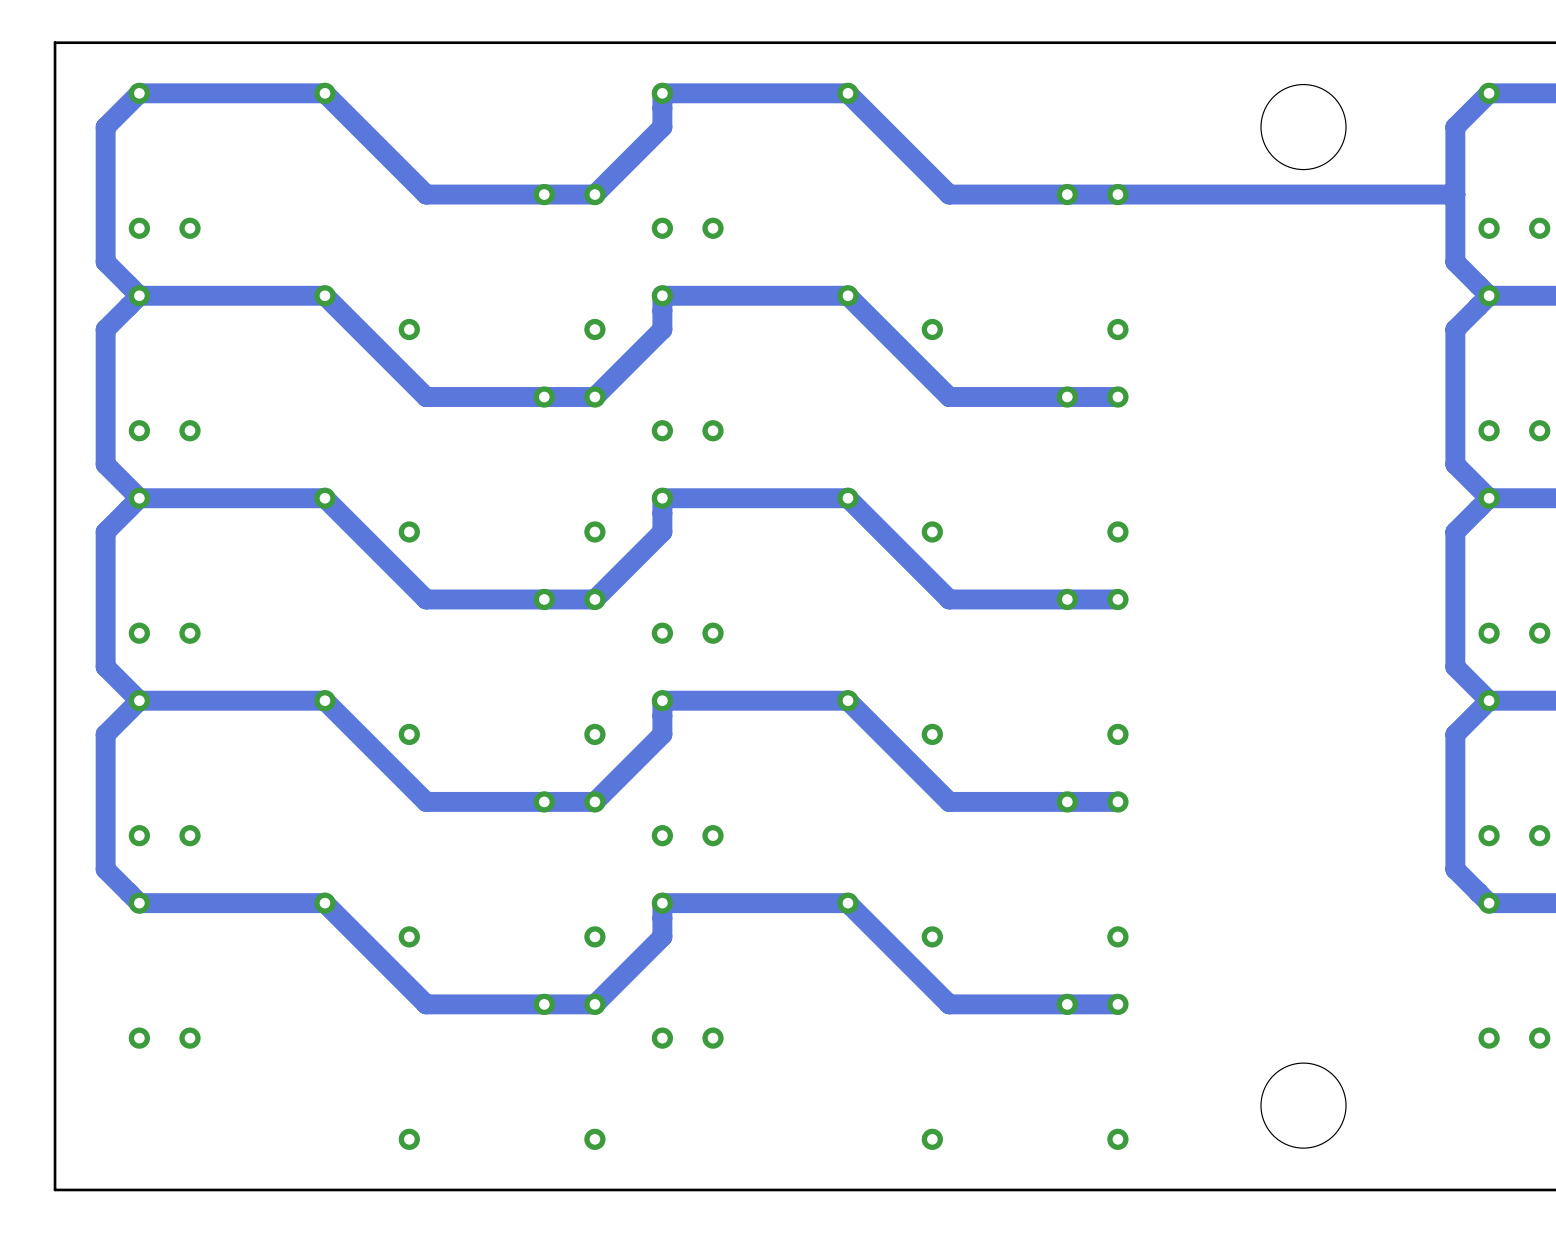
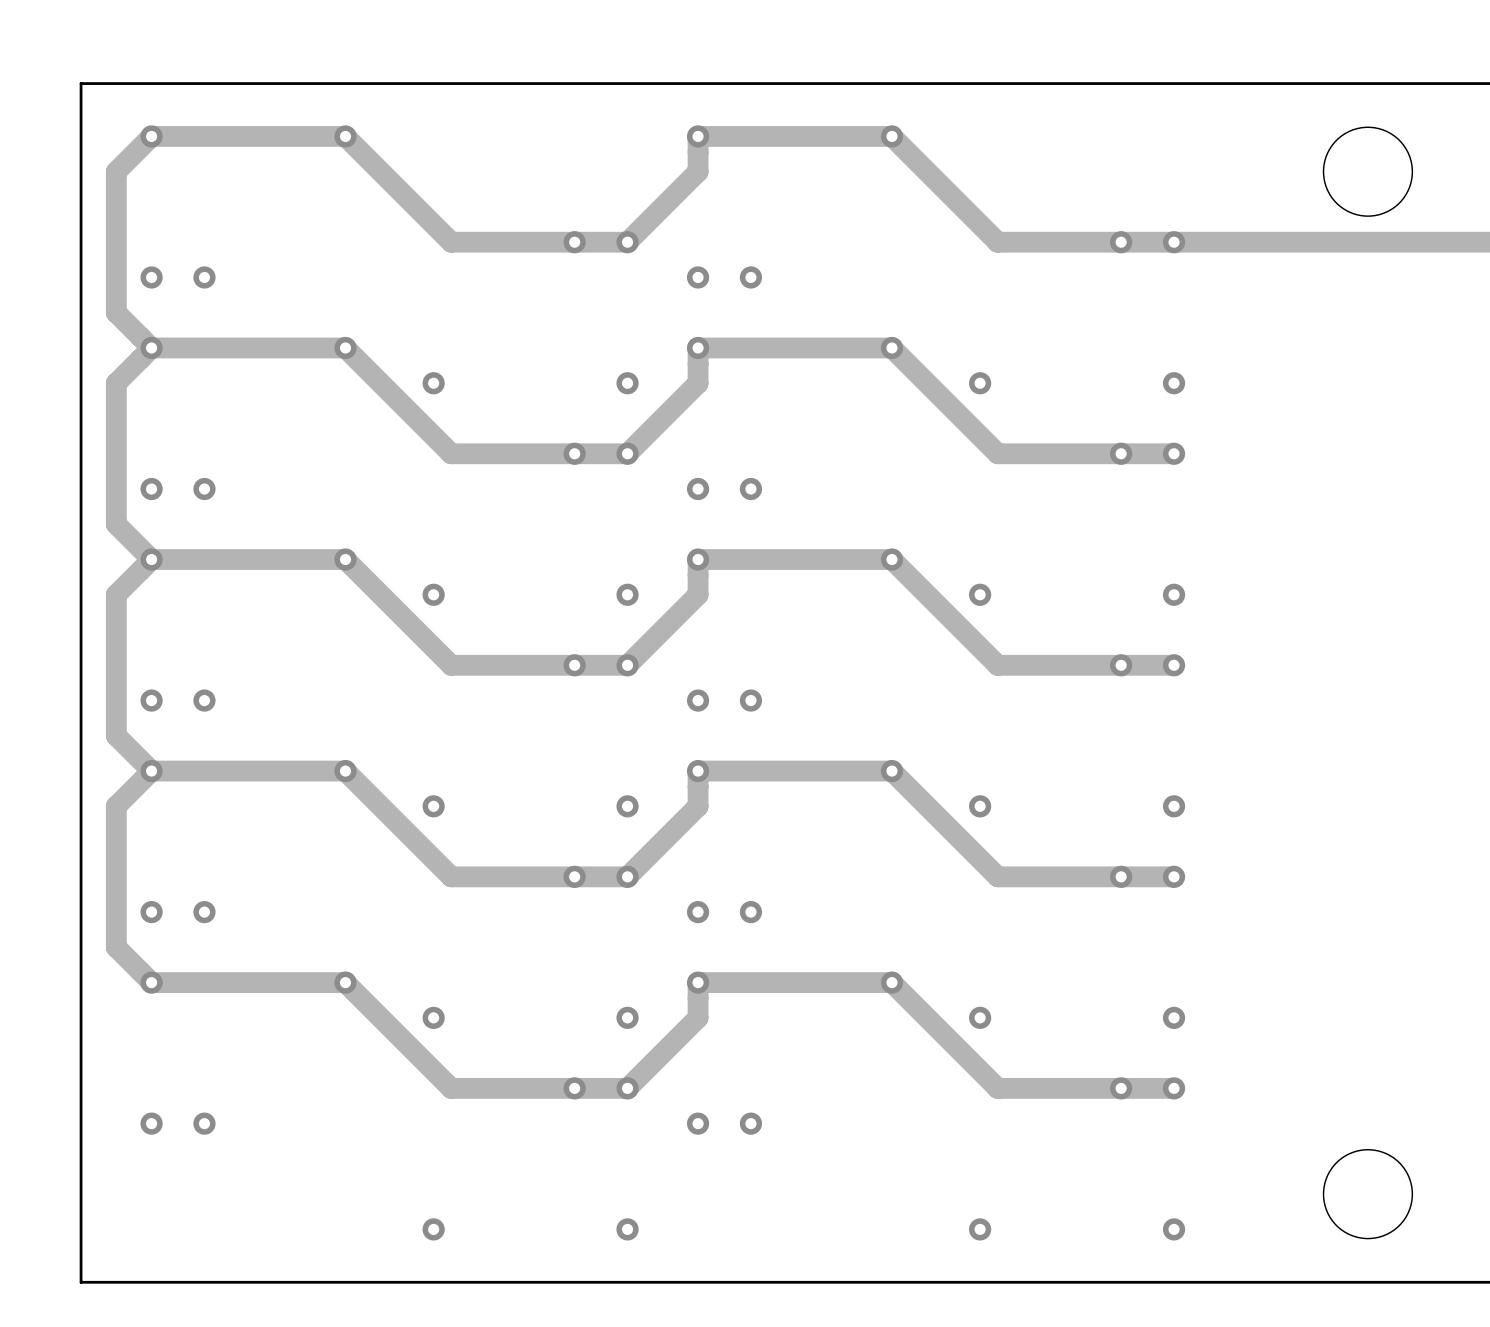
board edge: (71, 42) (55, 42) (55, 1189) (71, 1189) -> (81, 83) (81, 1282)

